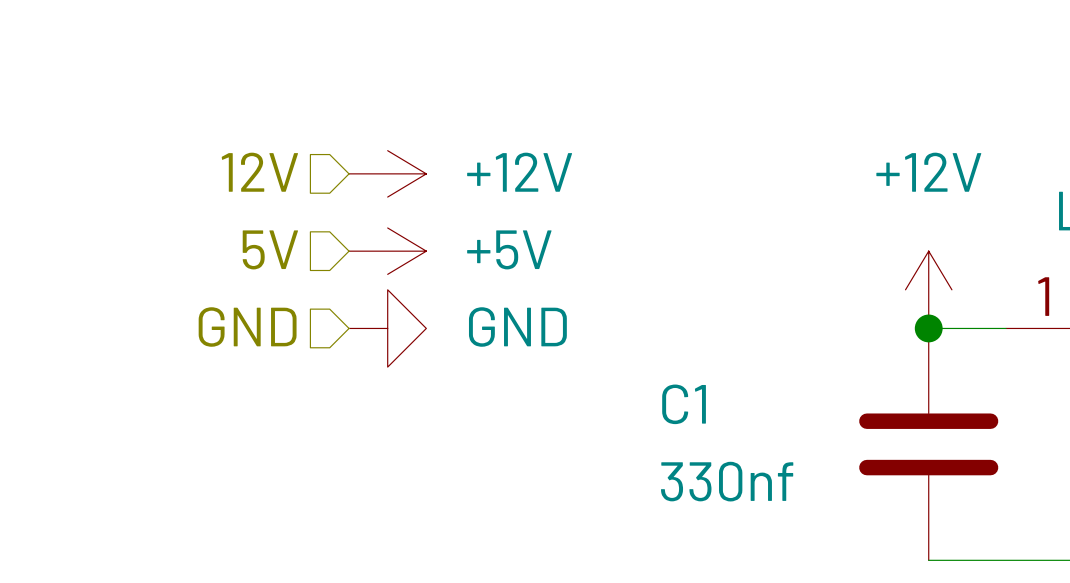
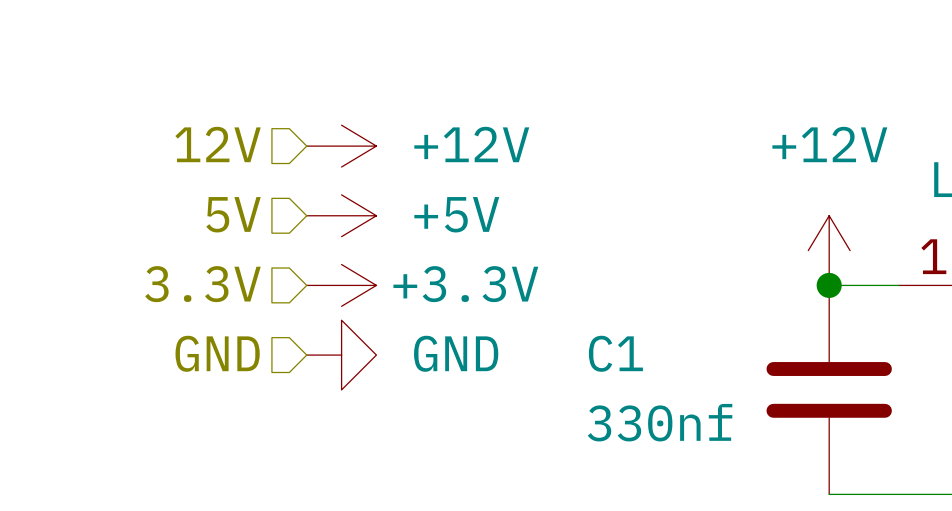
hierarchical label: GND (247, 327) -> 3.3V (202, 284)
power symbol: GND (387, 328) -> +3.3V (341, 285)
hierarchical label: none -> GND (217, 353)
power symbol: none -> GND (341, 355)

